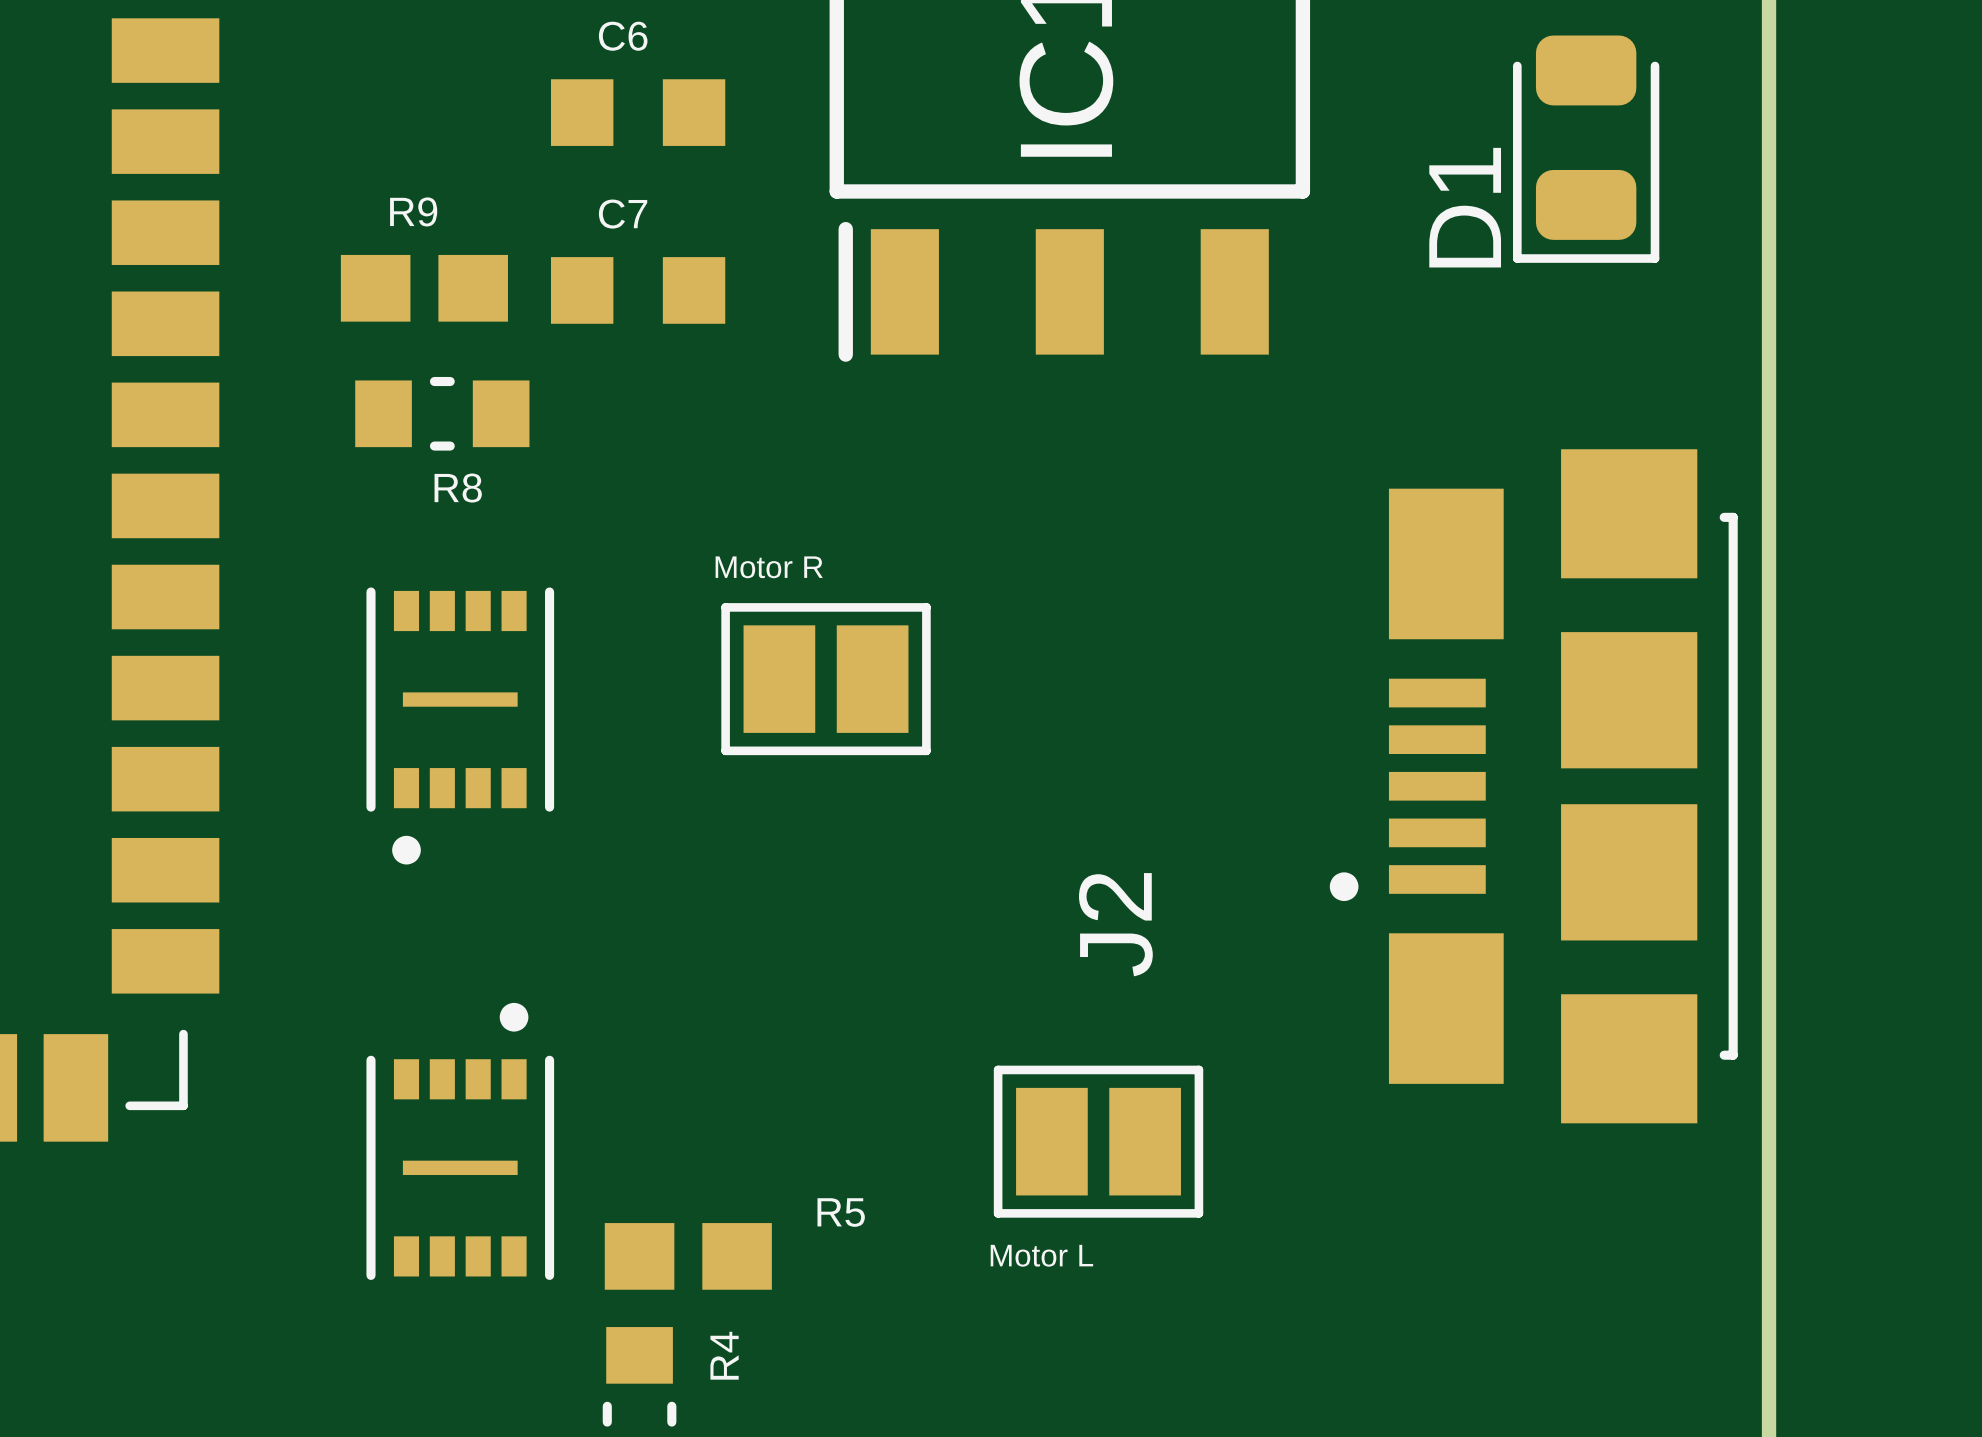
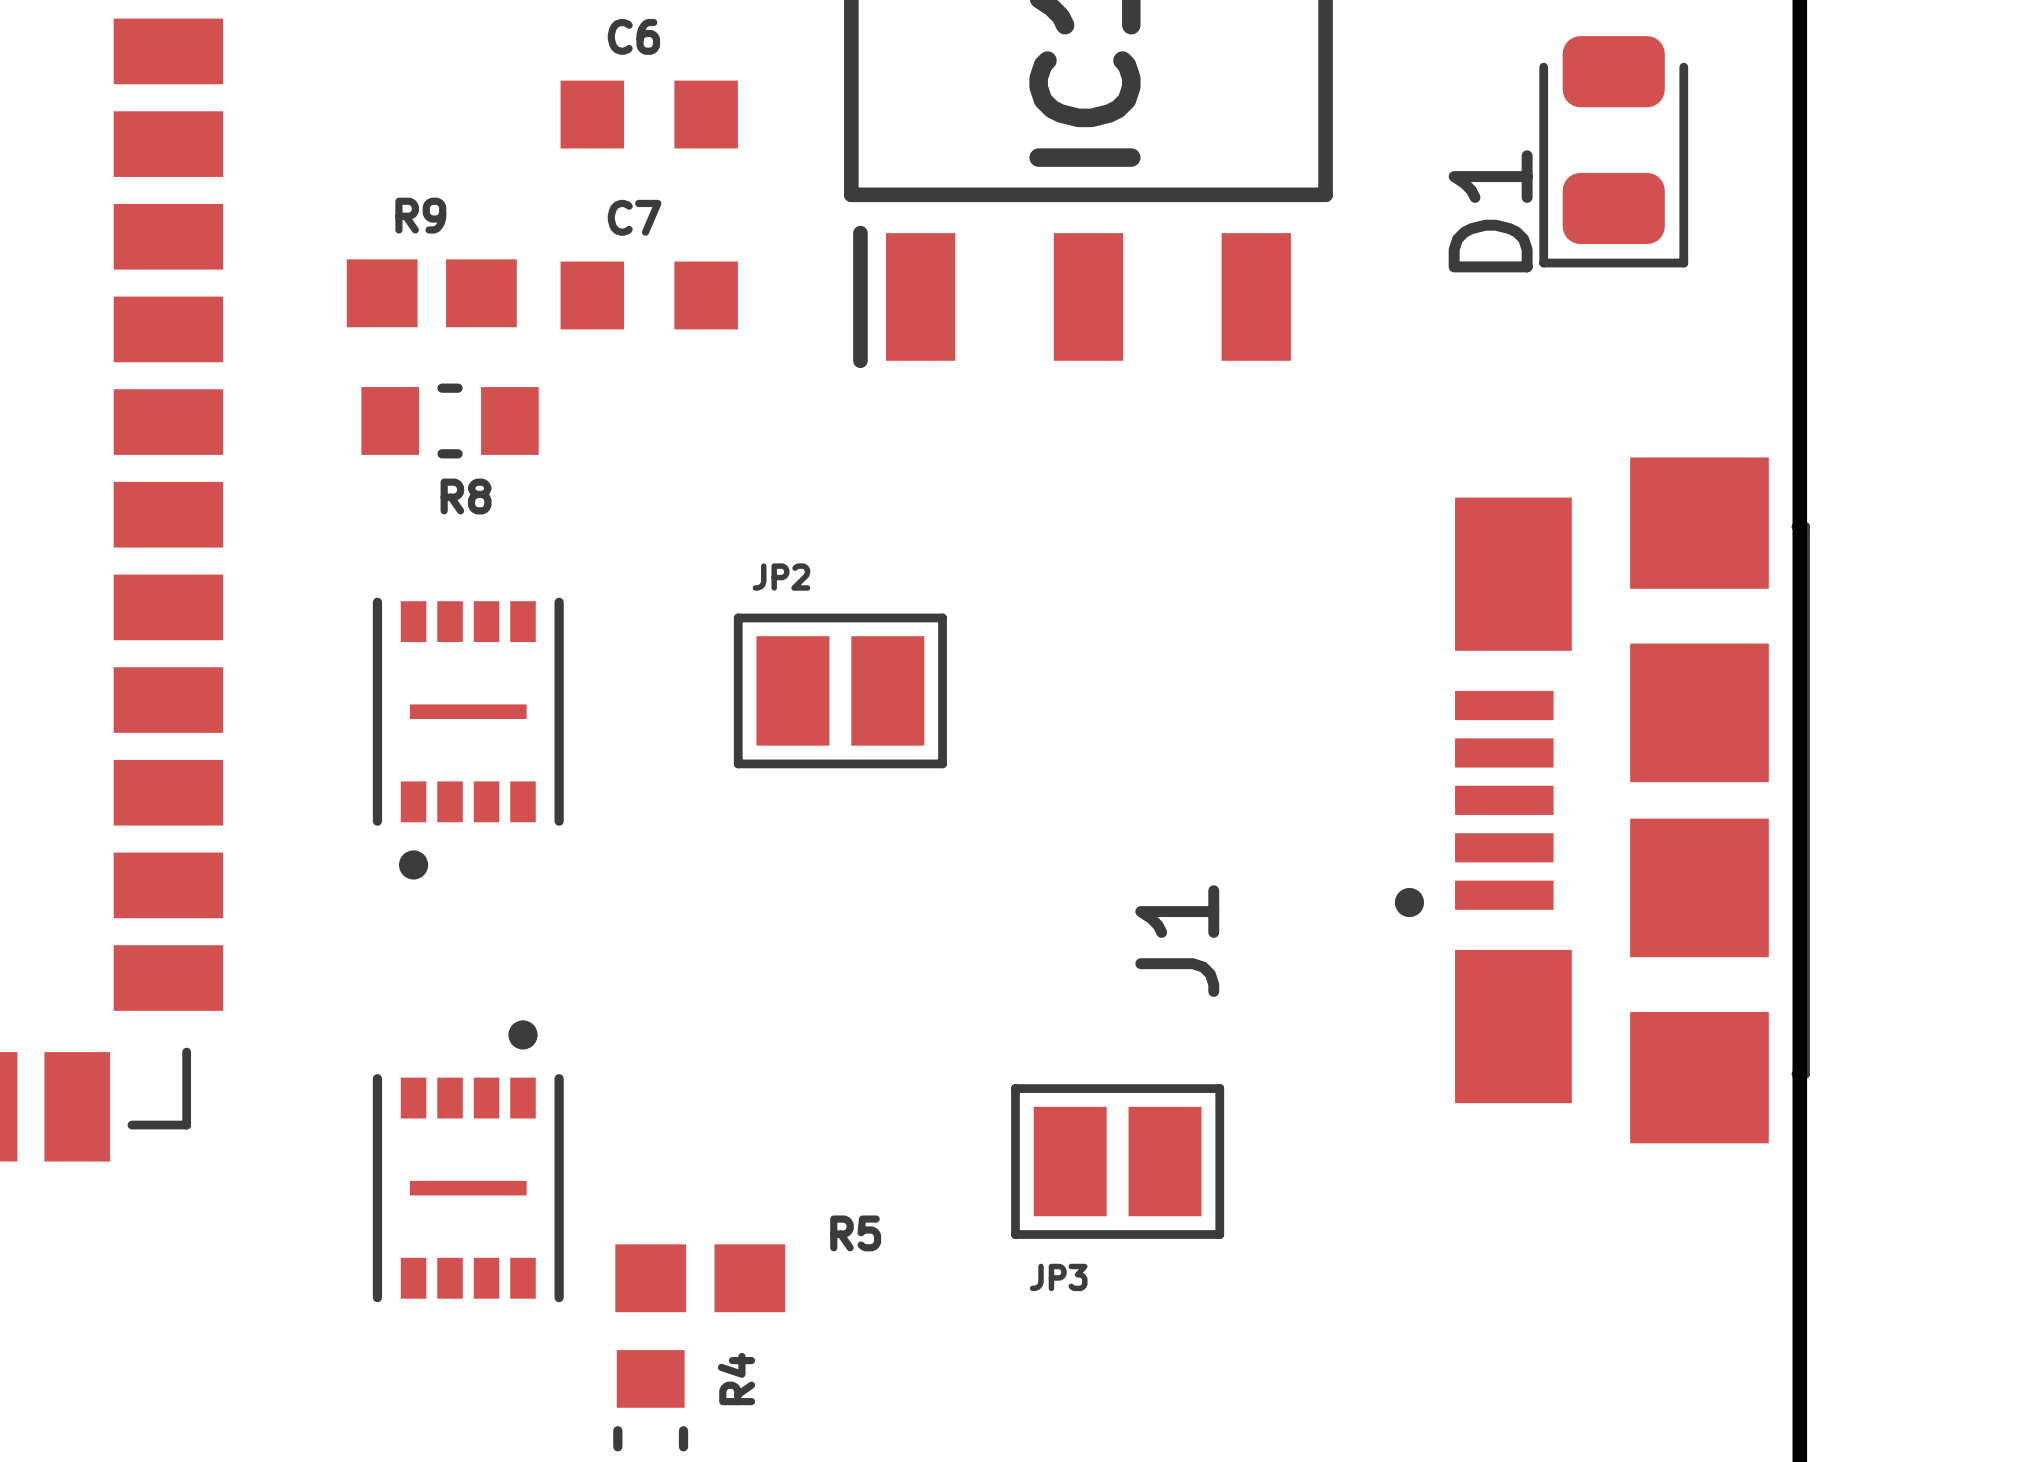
Motor R name: Motor R (769, 567) -> JP2 (781, 577)
J2 position: (1533, 786) -> (1602, 800)
J2 name: J2 (1115, 924) -> J1 (1177, 941)
Motor L name: Motor L (1041, 1255) -> JP3 (1058, 1277)

